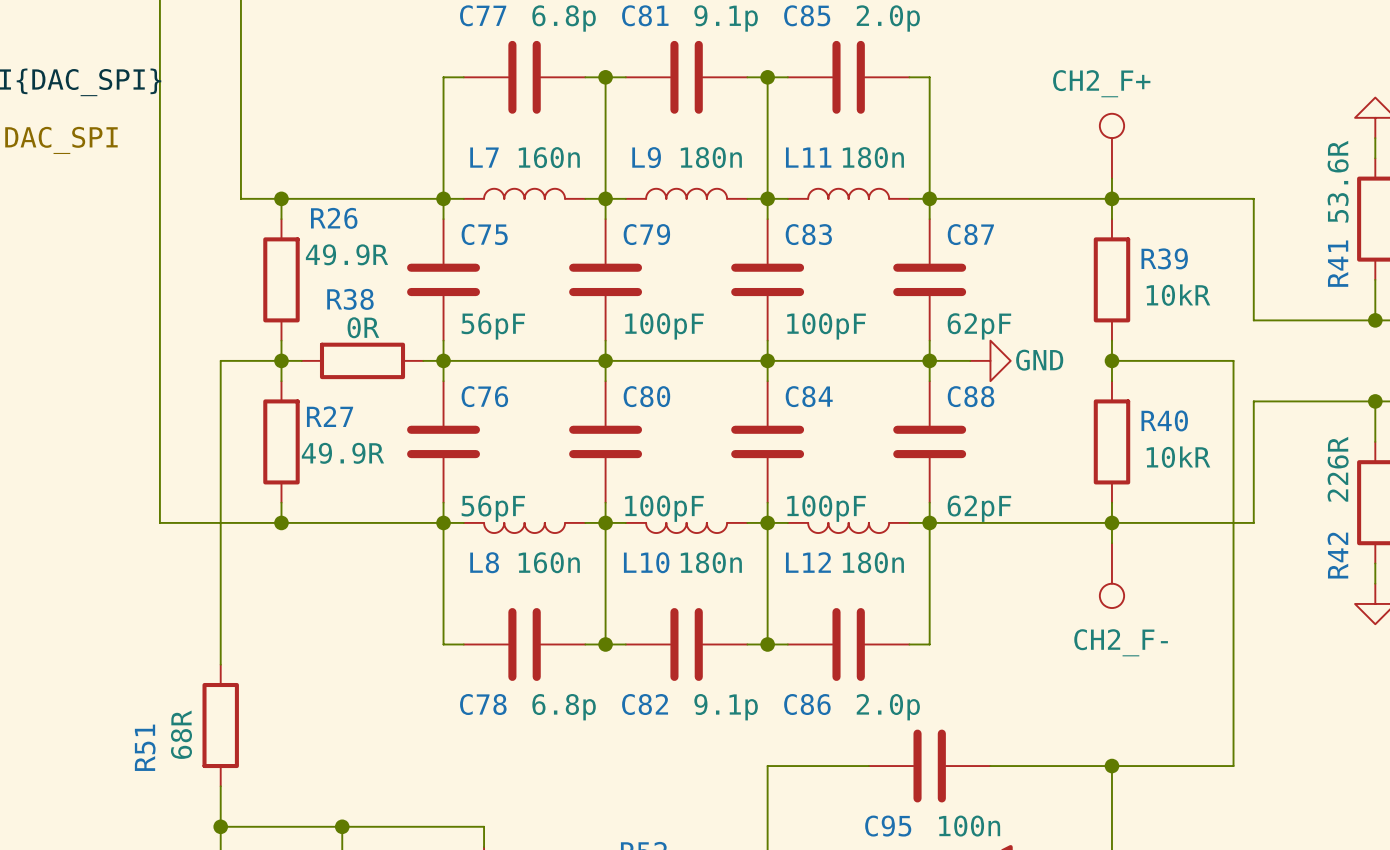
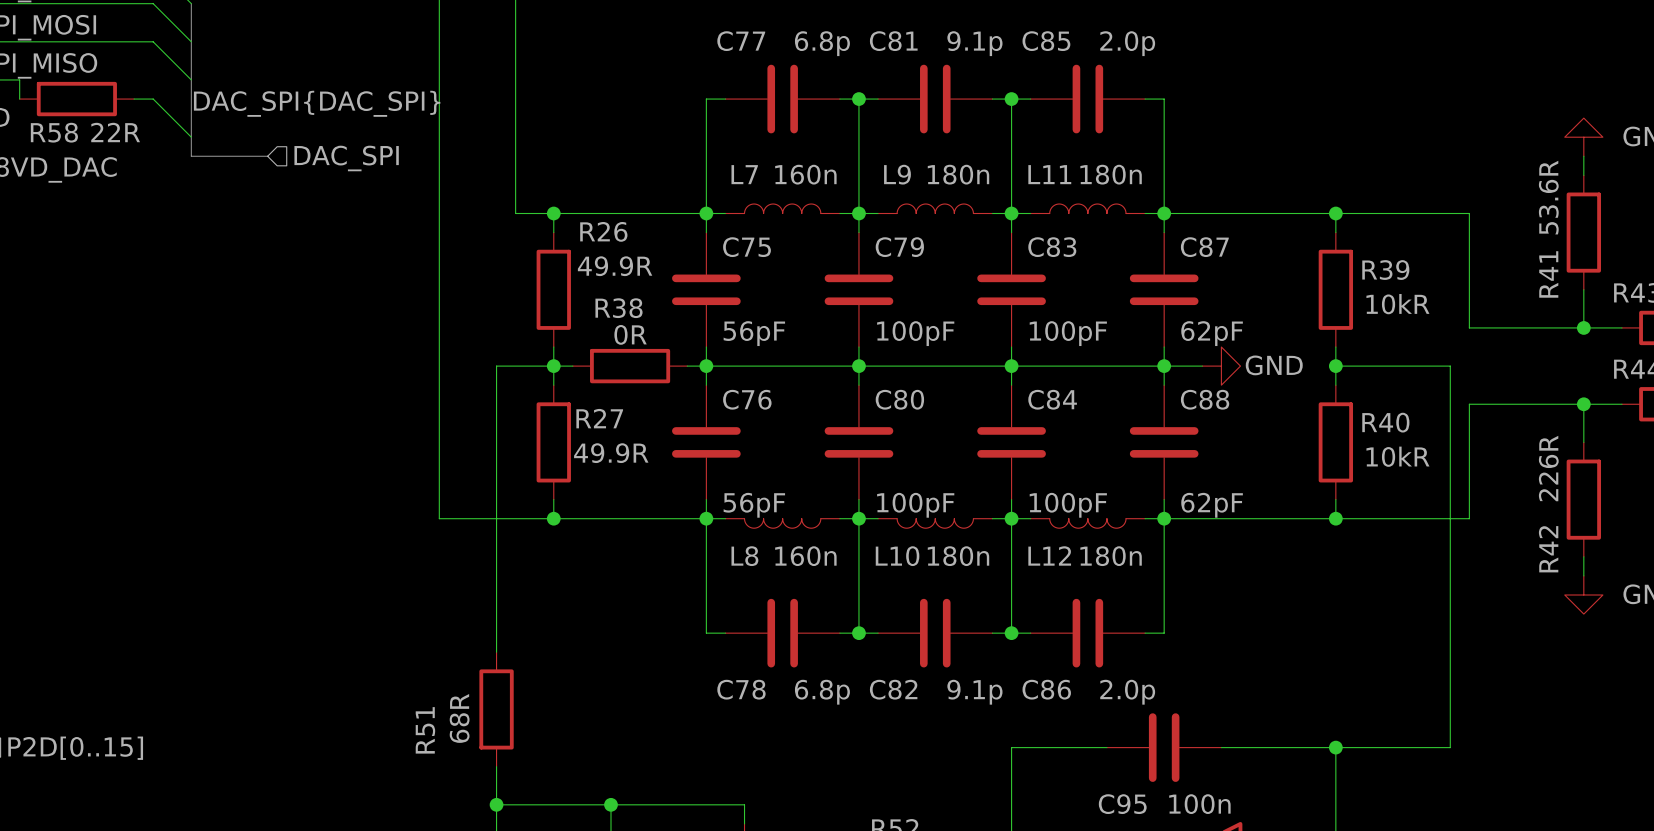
part: CH2_F+ (1111, 146) -> none
wire: (1111, 178) (1111, 198) -> none
wire: (1111, 522) (1111, 543) -> none
part: CH2_F- (1111, 575) -> none

